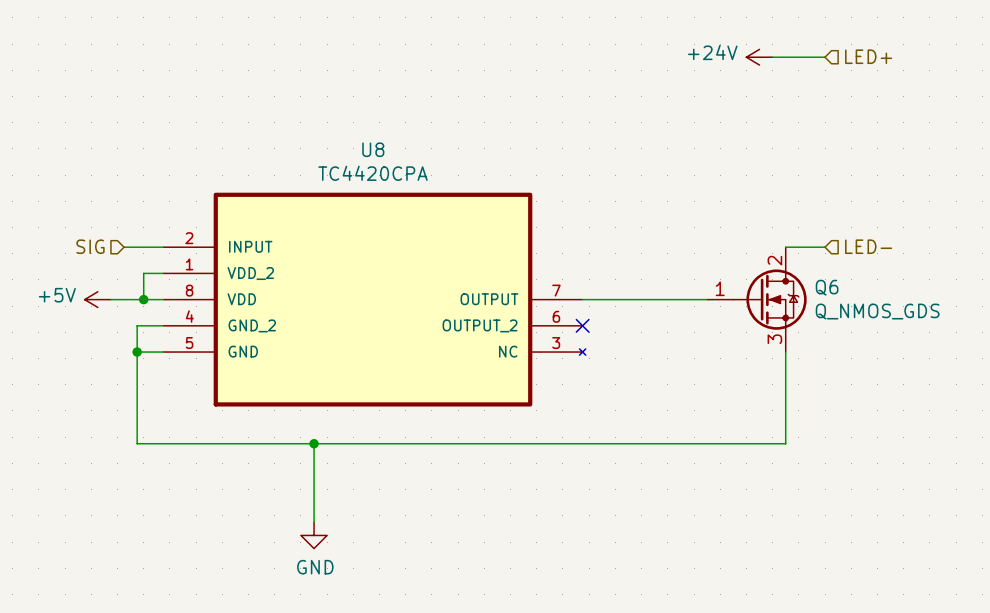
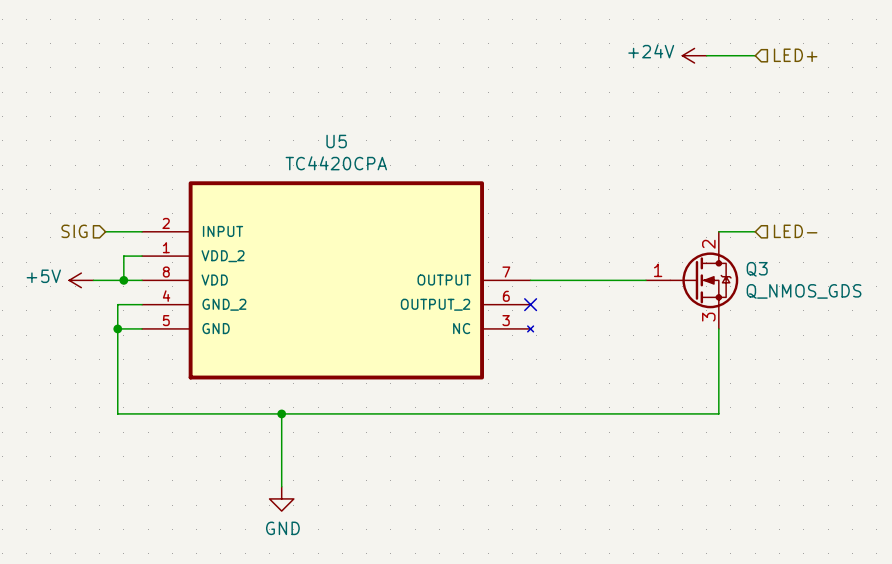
U8 name: U8 (373, 149) -> U5 (336, 141)
Q6 name: Q6 (827, 287) -> Q3 (757, 269)

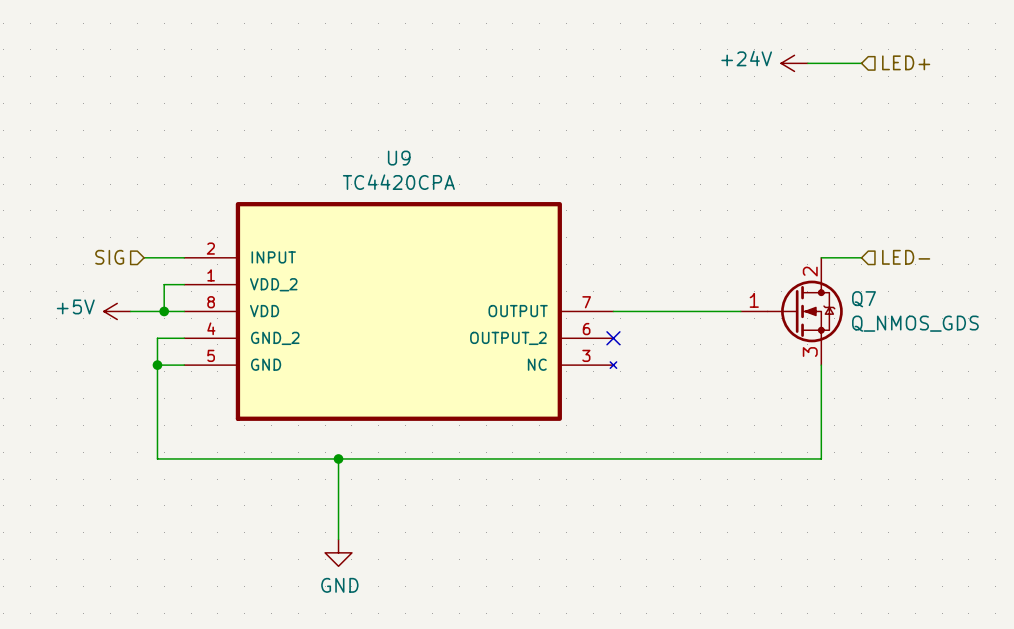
U5 name: U5 (336, 141) -> U9 (399, 158)
Q3 name: Q3 (757, 269) -> Q7 (864, 299)

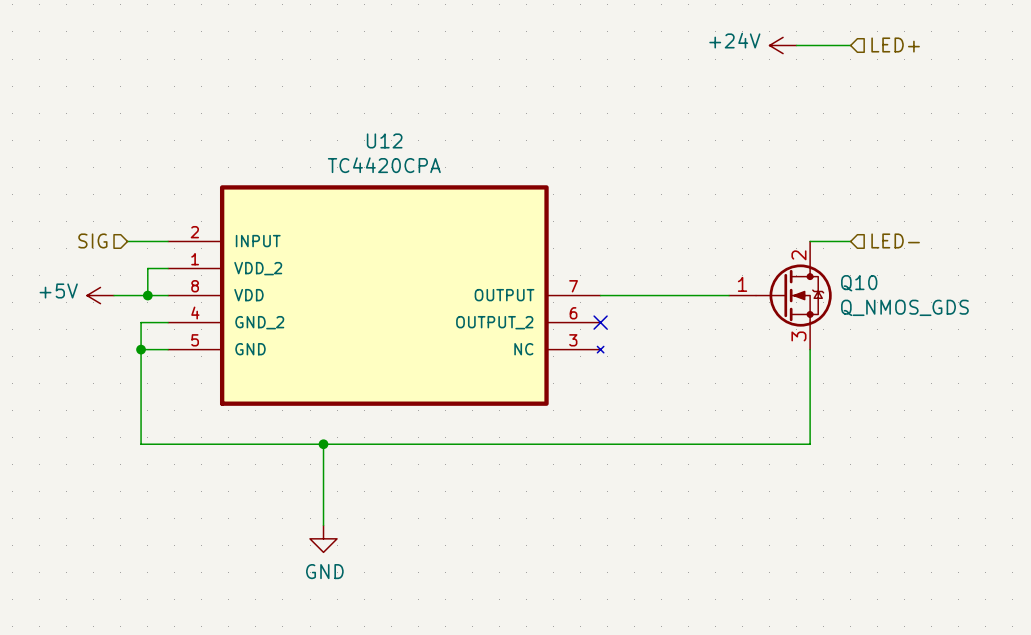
U9 name: U9 (399, 158) -> U12 (384, 140)
Q7 name: Q7 (864, 299) -> Q10 (859, 283)

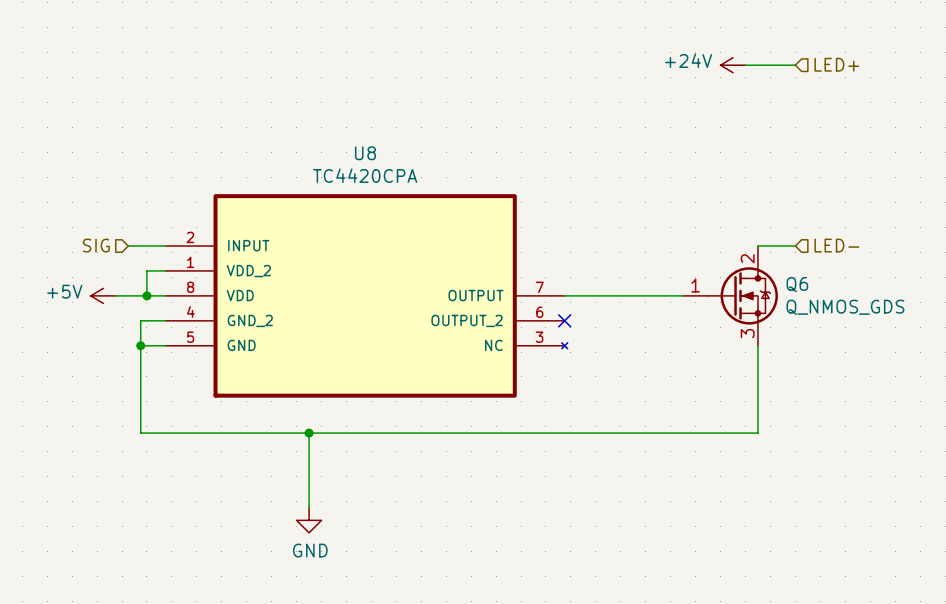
U12 name: U12 (384, 140) -> U8 (365, 153)
Q10 name: Q10 (859, 283) -> Q6 (797, 284)

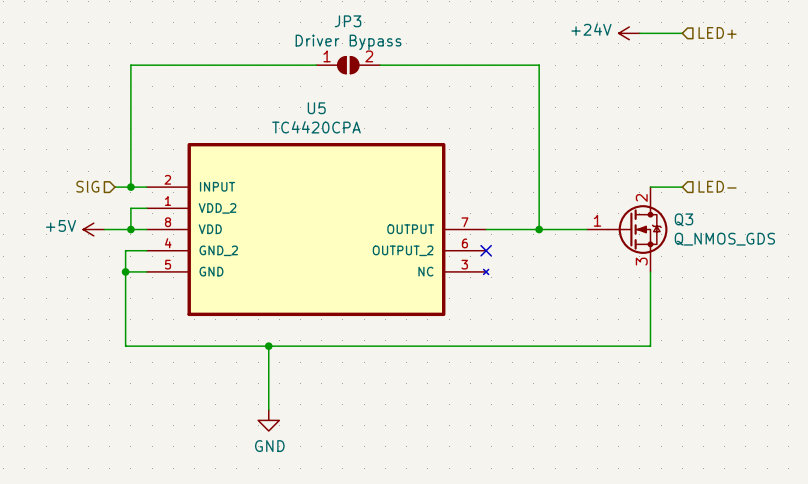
wire: none -> (316, 65) (130, 65) (130, 187)
JP3: none -> Driver Bypass (348, 65)
wire: none -> (380, 65) (539, 65) (539, 229)
U8 name: U8 (365, 153) -> U5 (316, 108)
junction: none -> (130, 187)
Q6 name: Q6 (797, 284) -> Q3 (683, 219)
junction: none -> (539, 229)

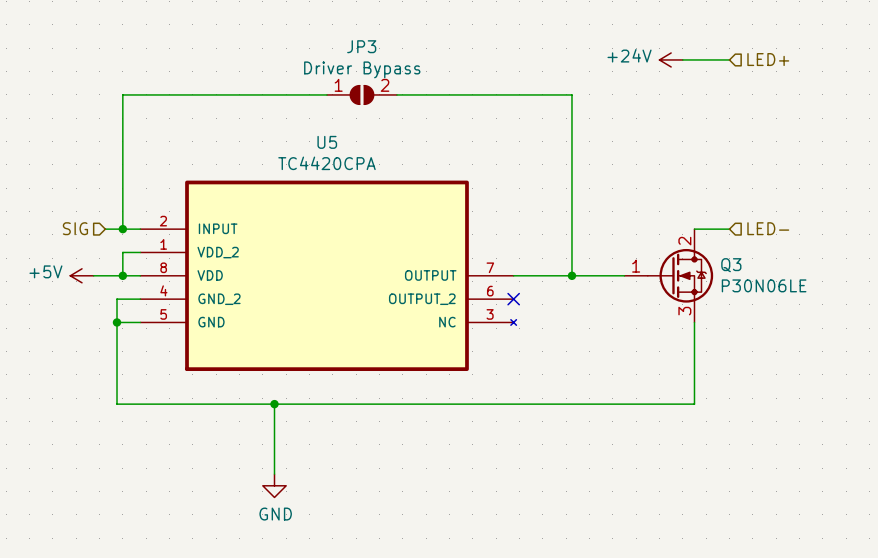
Q3 value: Q_NMOS_GDS (724, 239) -> P30N06LE (764, 285)

